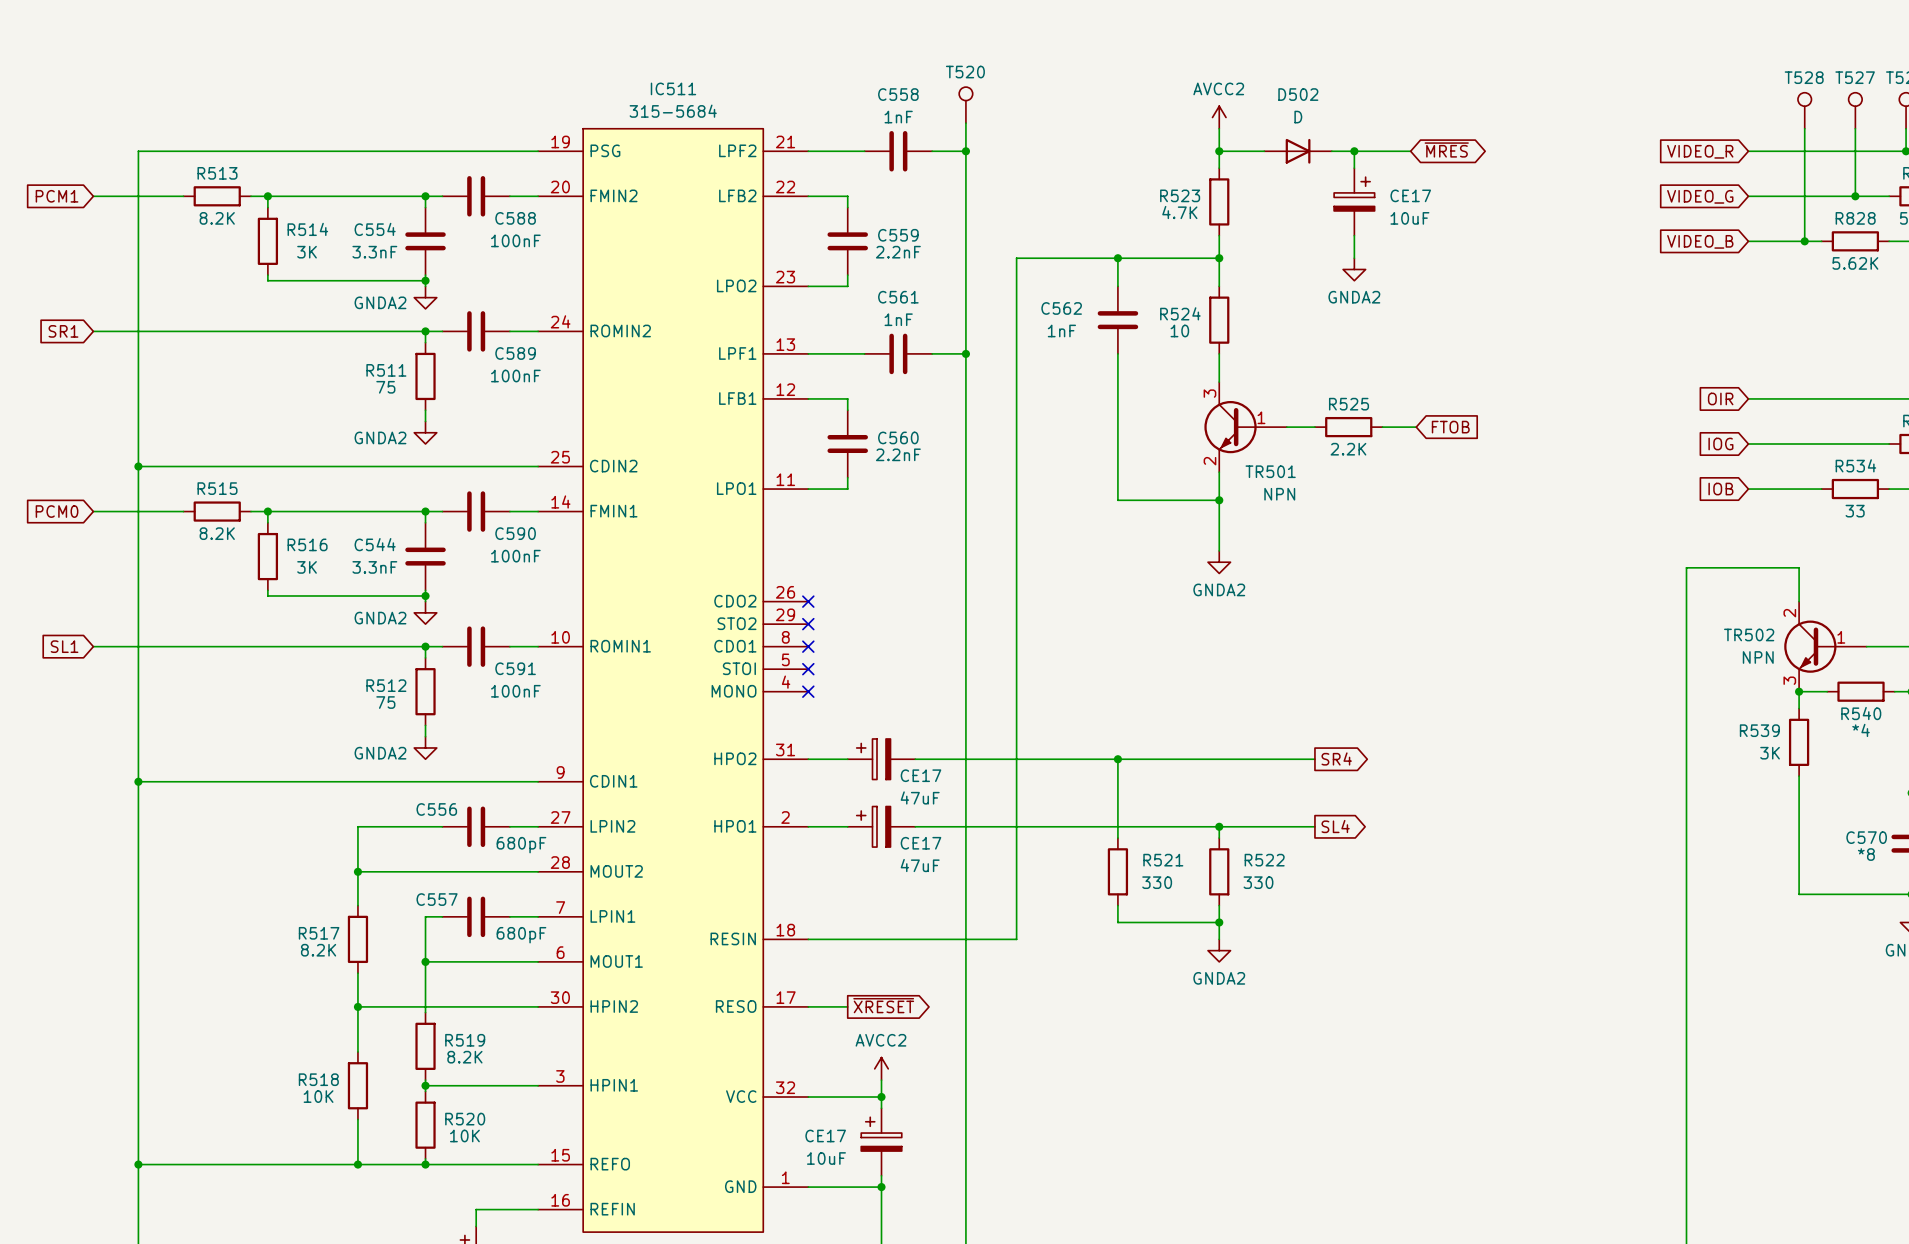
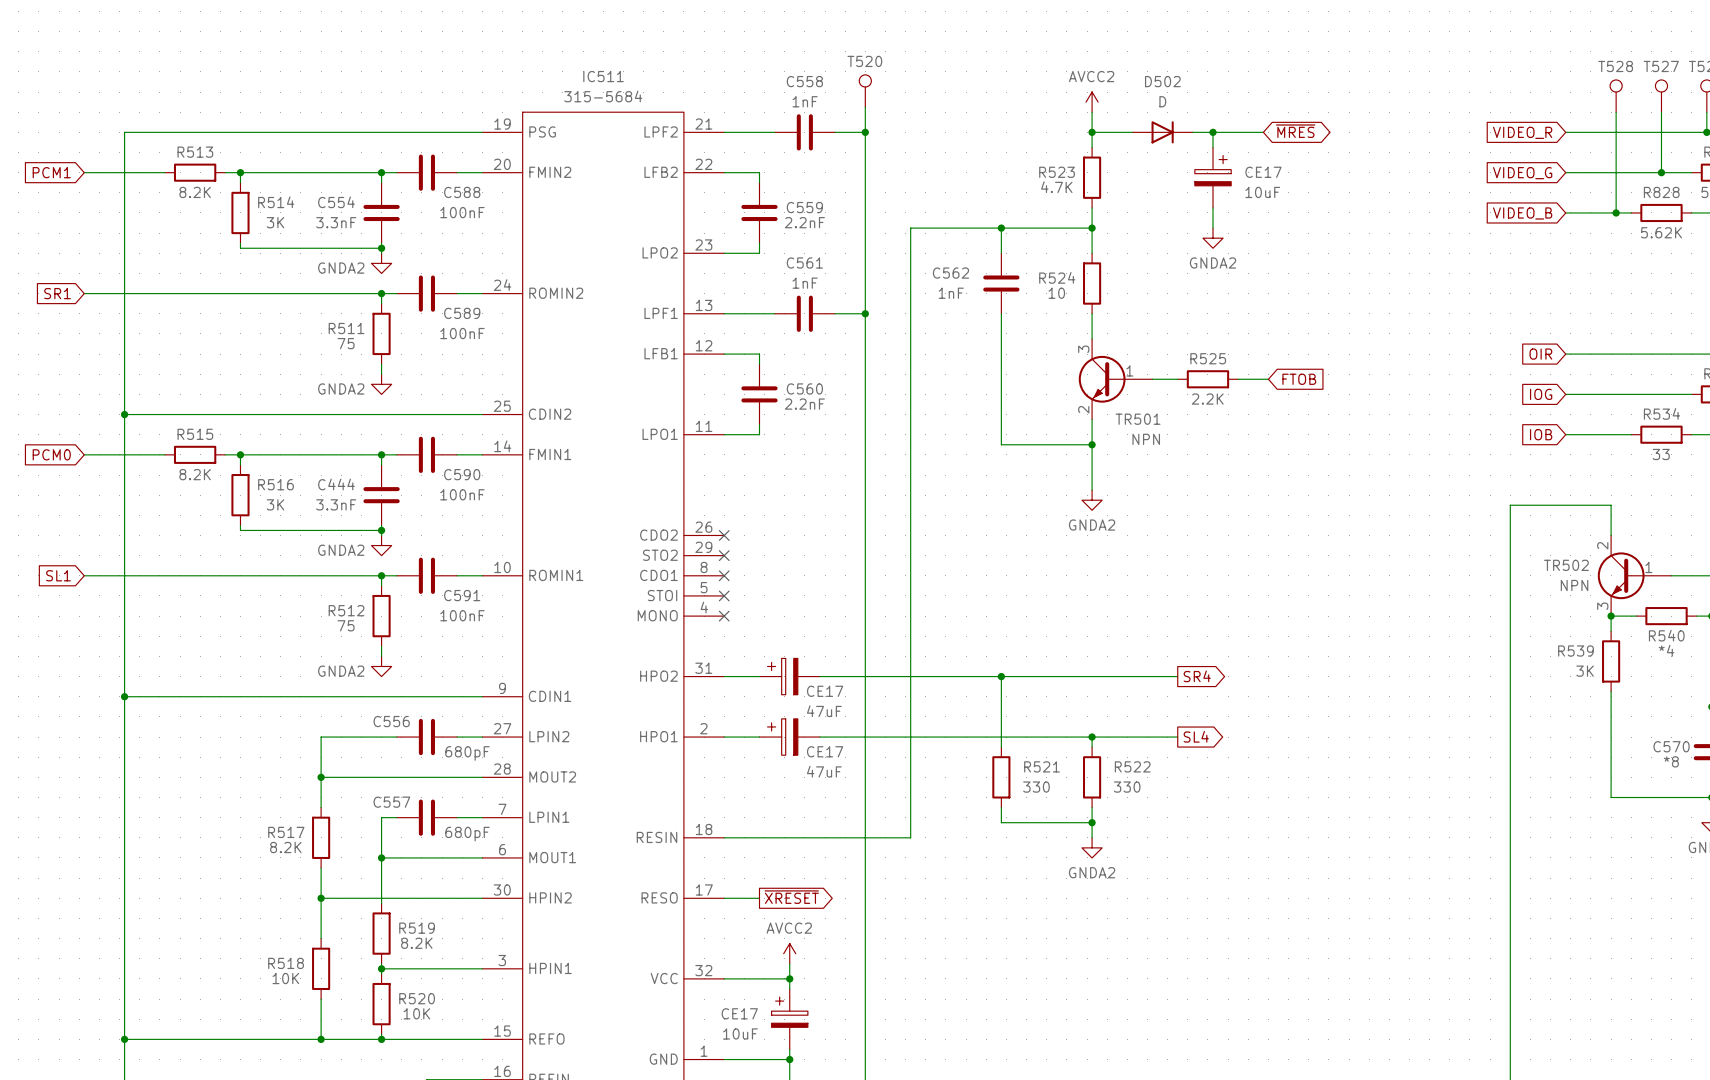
C544 name: C544 (375, 544) -> C444 (336, 484)

